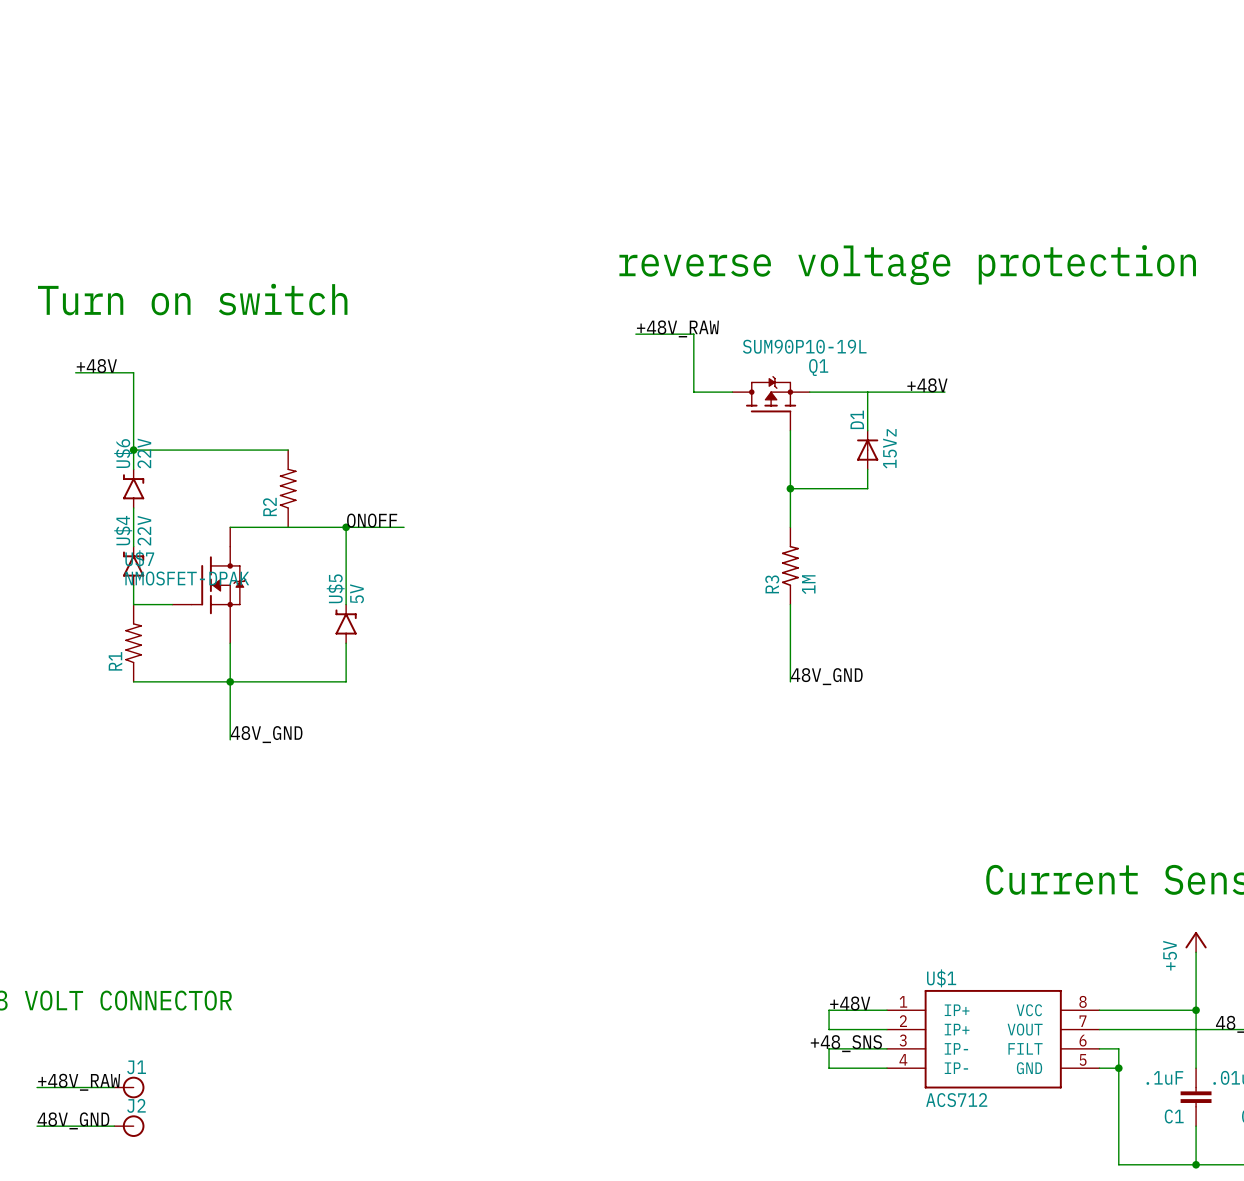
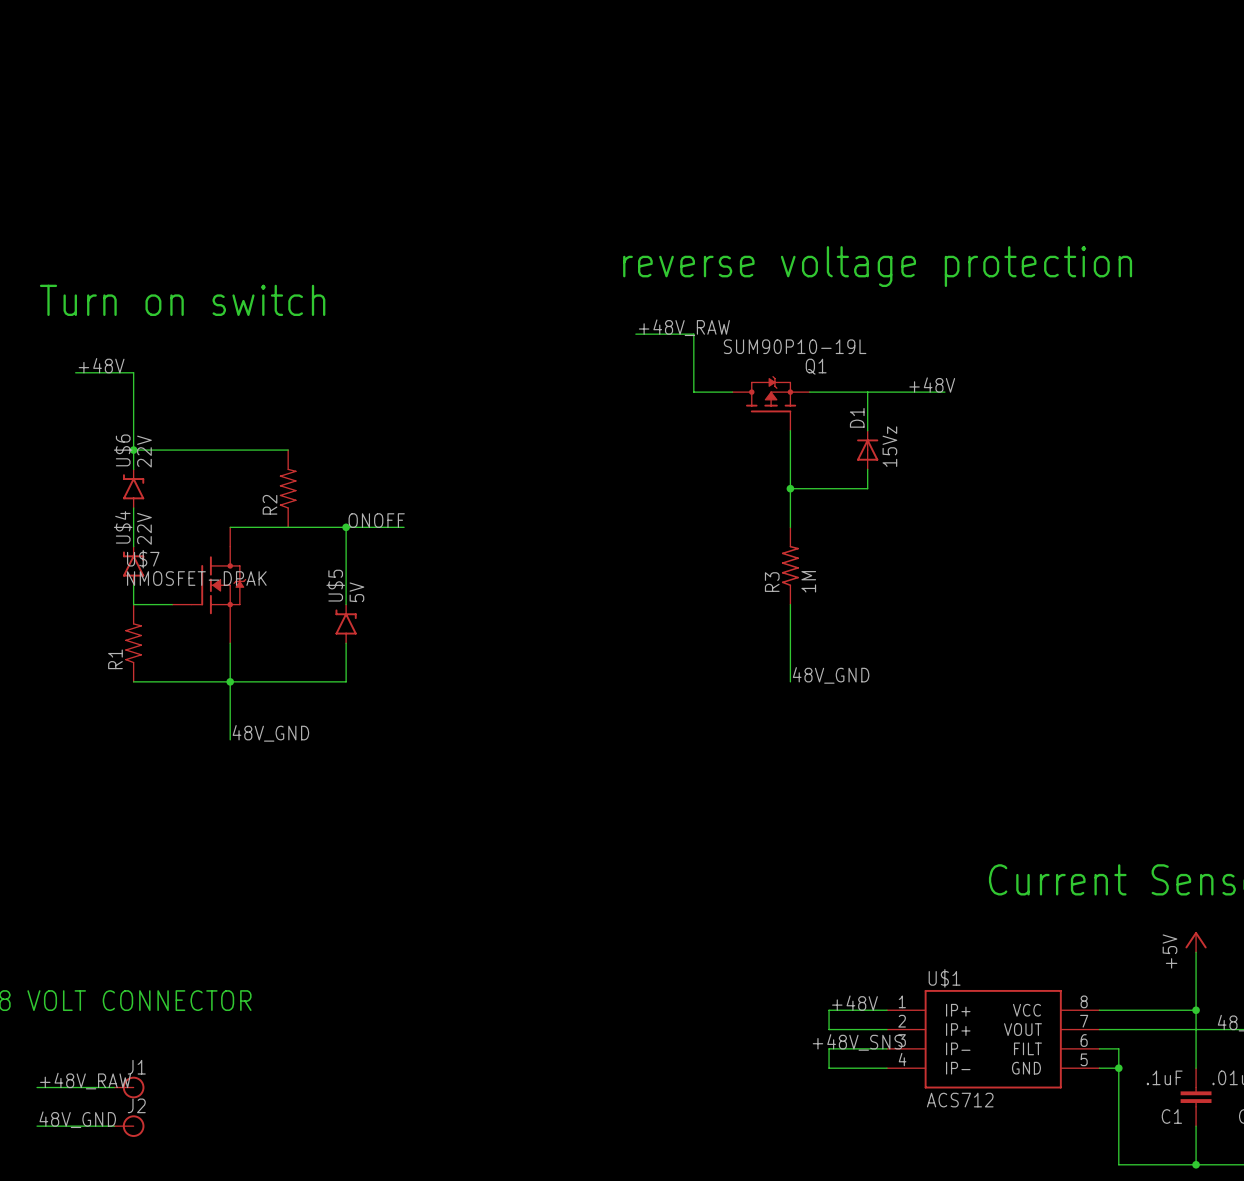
label: +48_SNS (846, 1043) -> +48V_SNS (857, 1042)

